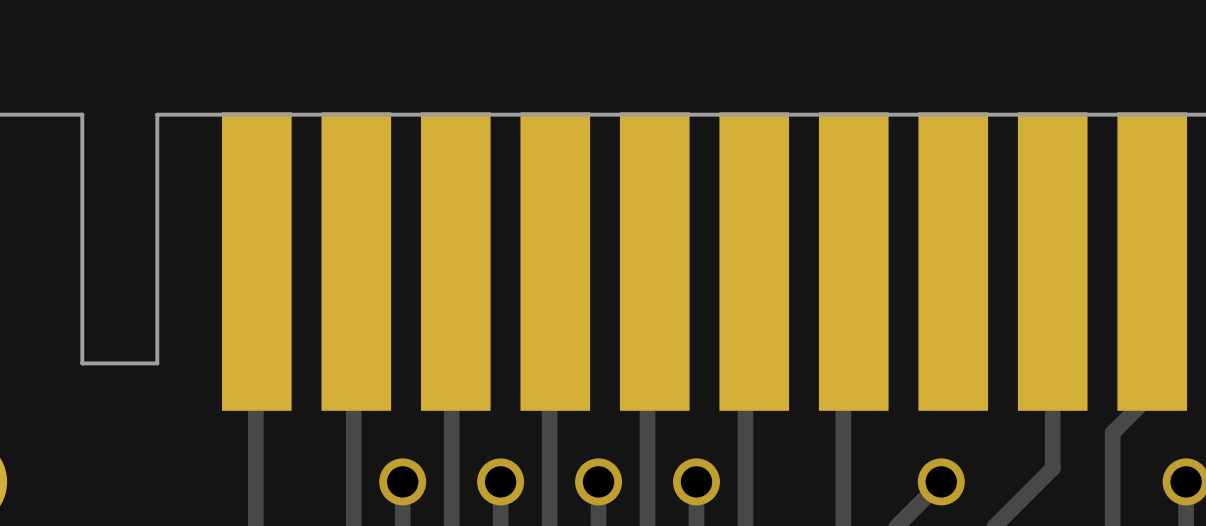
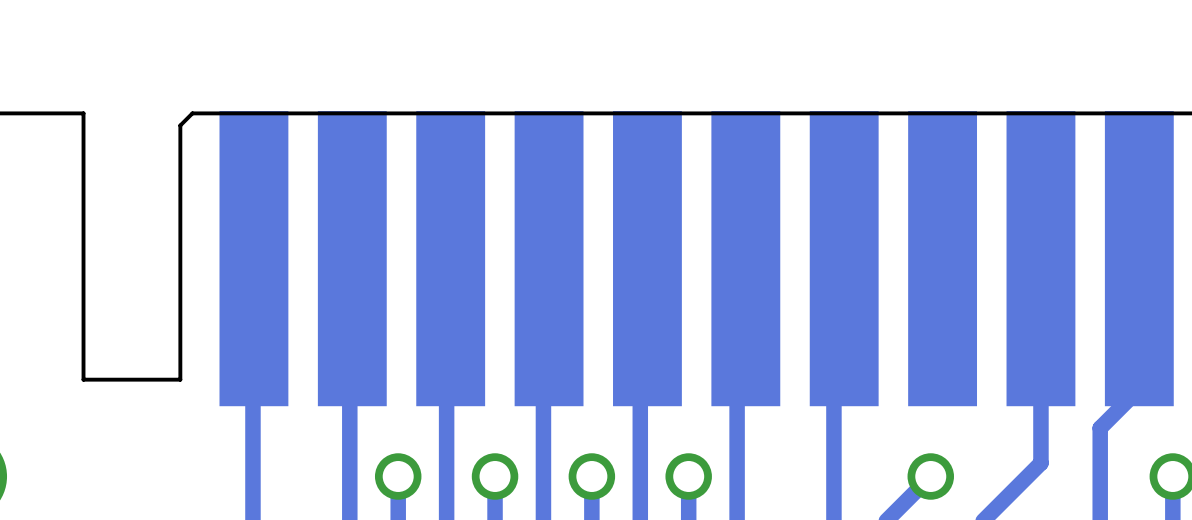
board edge: (194, 114) (157, 114) (157, 363) (82, 363) (82, 114) -> (192, 113) (180, 125) (180, 379) (83, 379) (83, 113) (81, 113)

